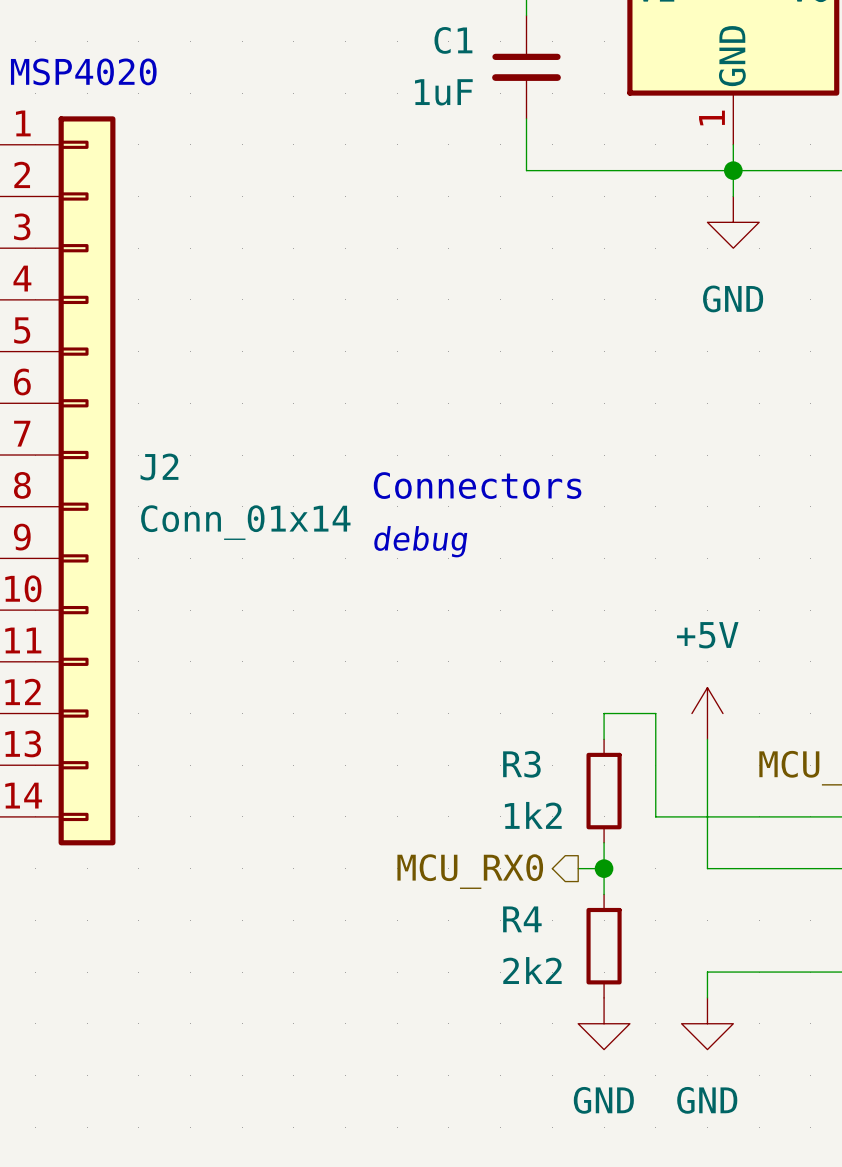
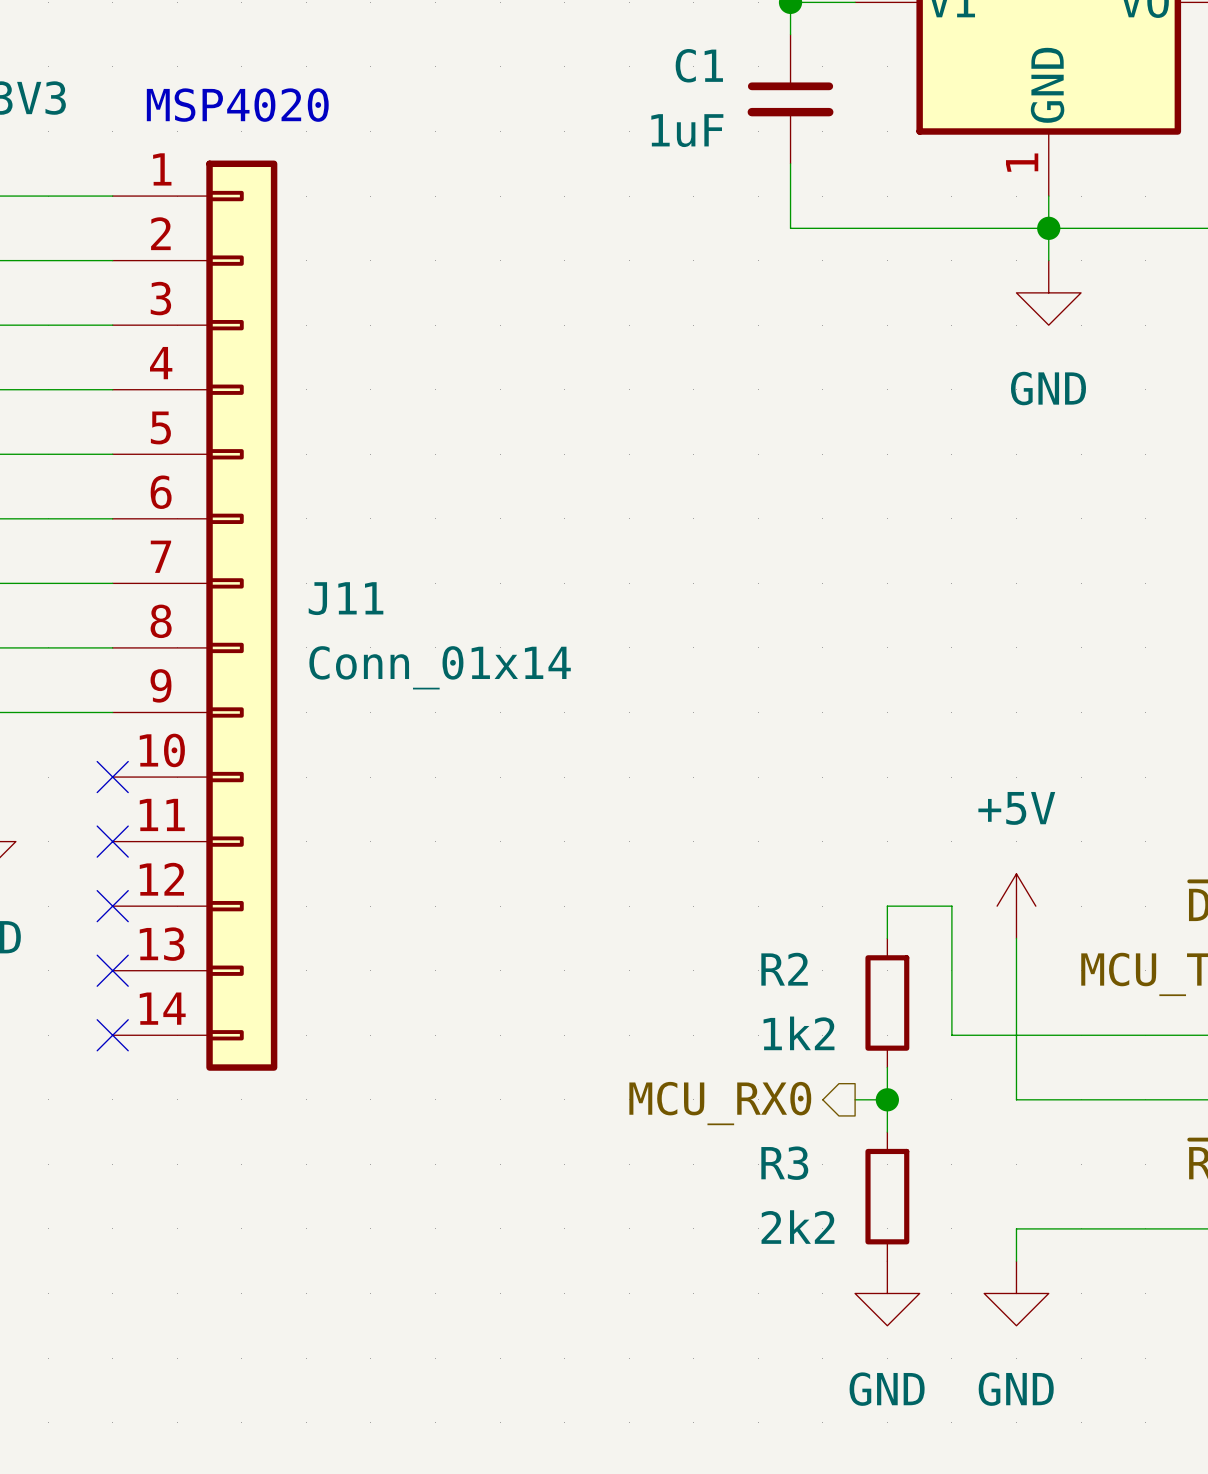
J2 name: J2 (159, 466) -> J11 (346, 598)
text: Connectors (477, 485) -> none
text: debug (420, 541) -> none
R3 name: R3 (521, 764) -> R2 (784, 969)
R4 name: R4 (522, 919) -> R3 (784, 1163)

